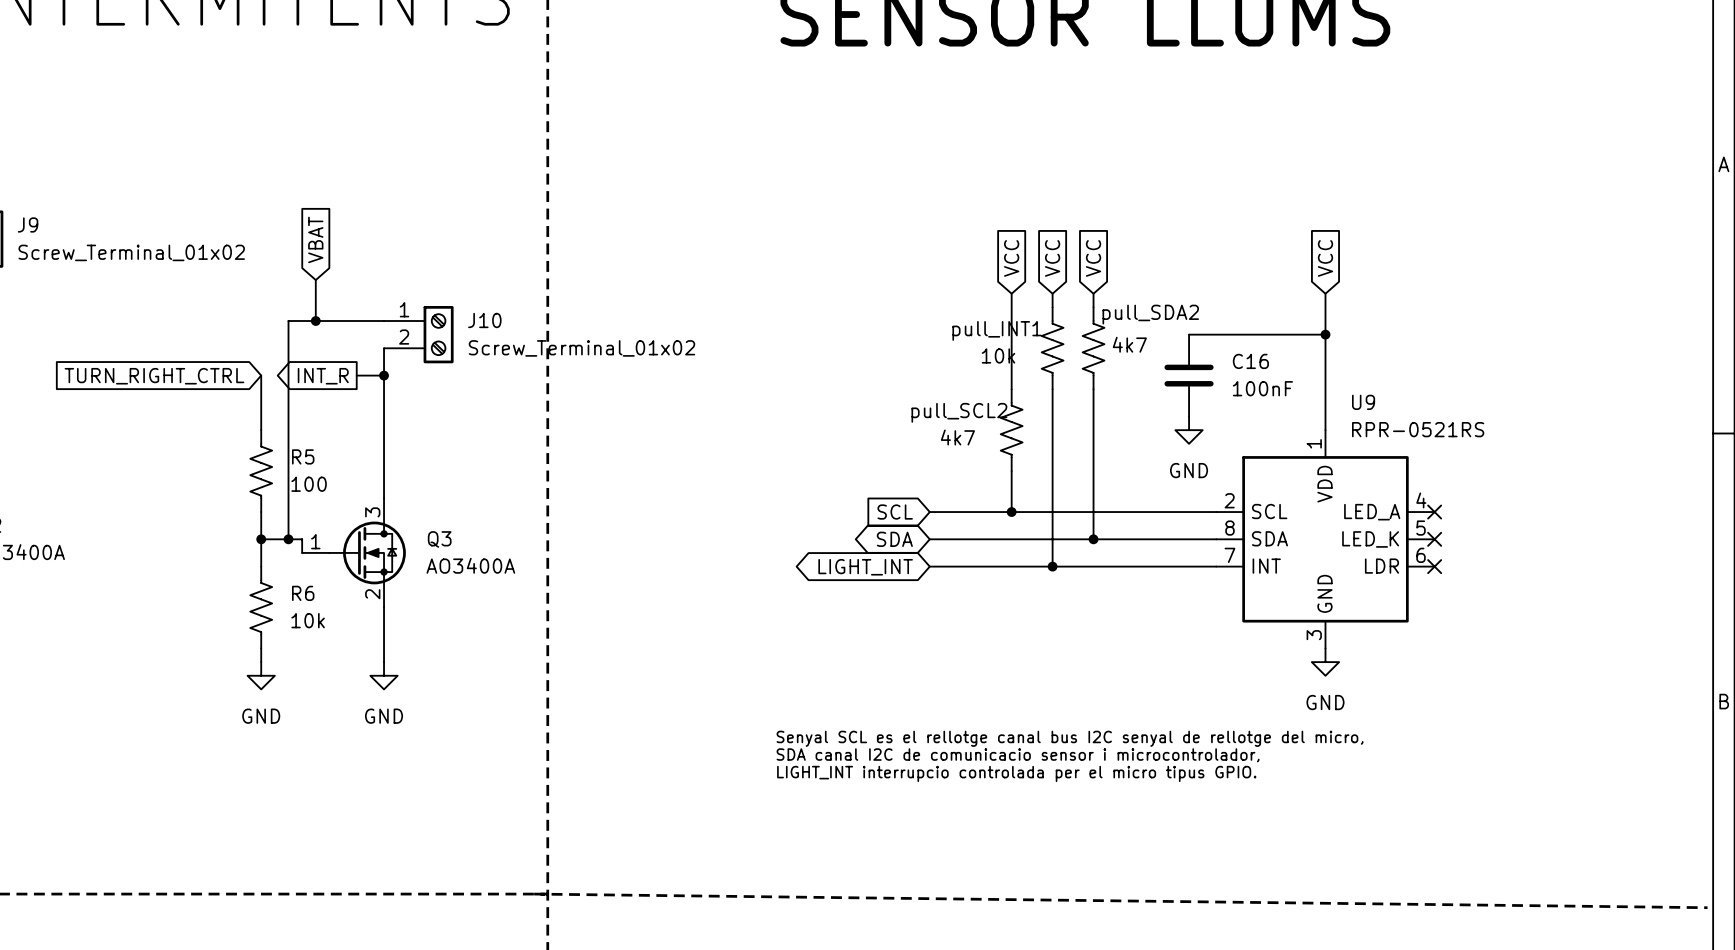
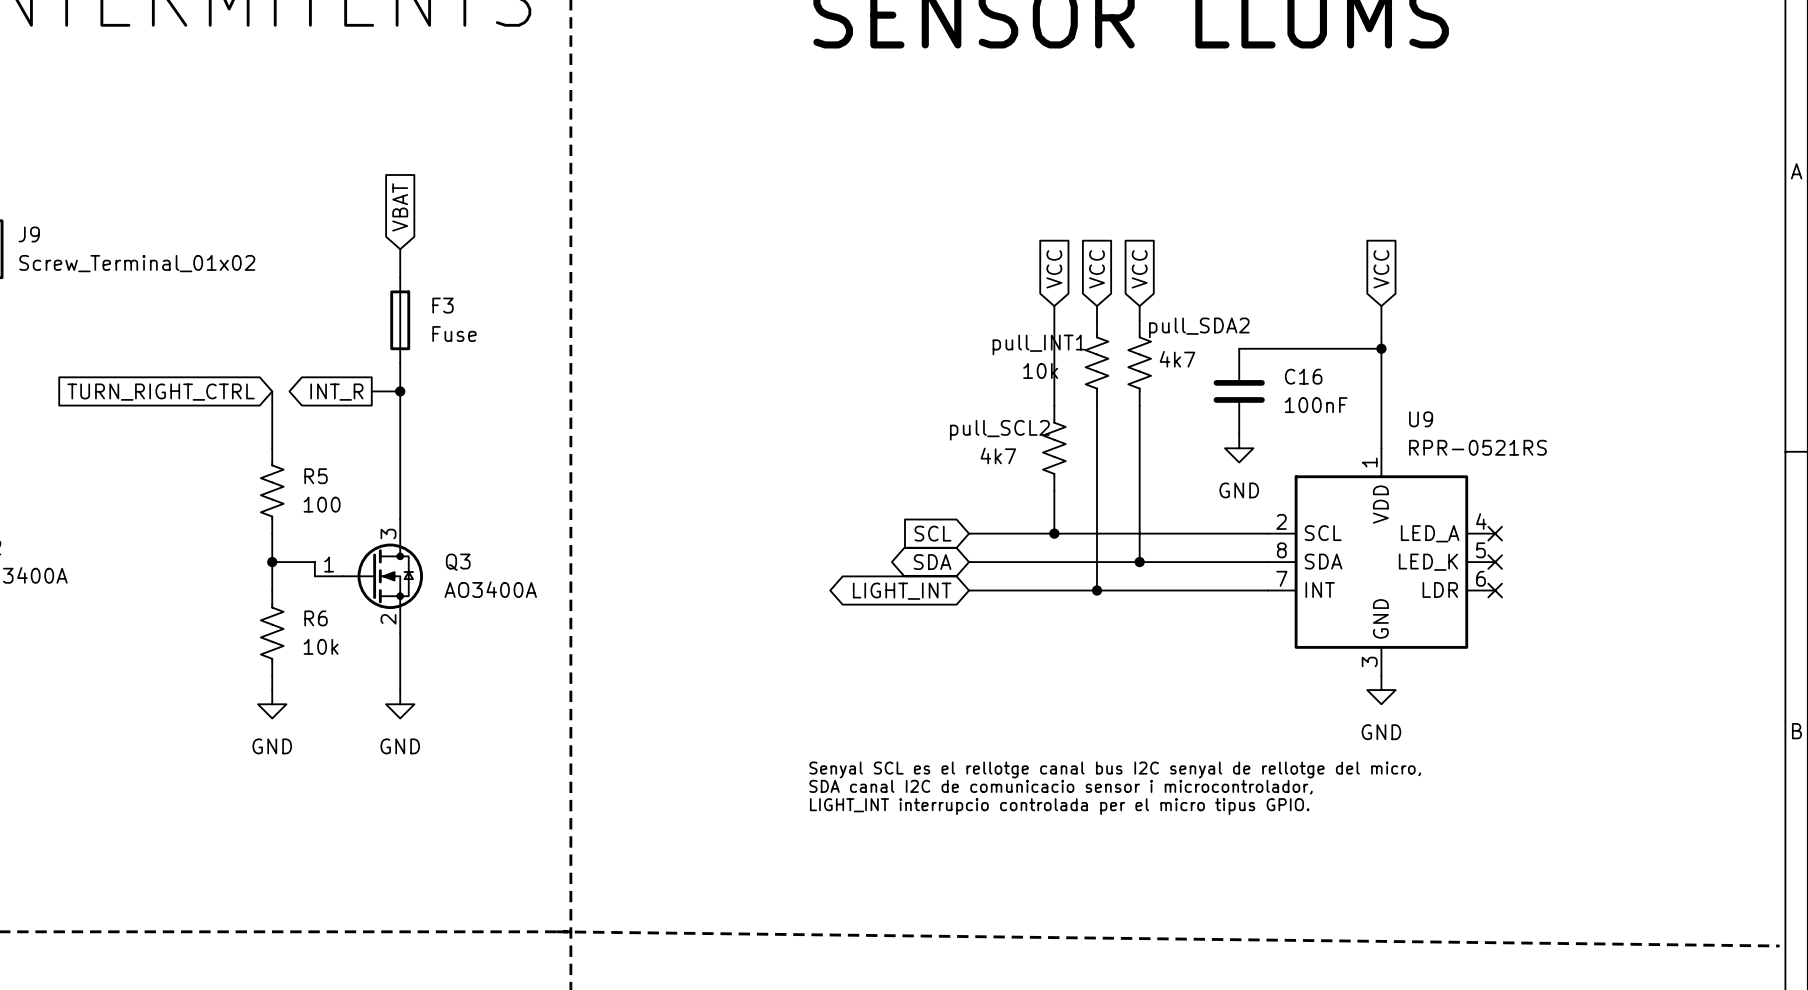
global label position: VBAT (315, 239) -> VBAT (400, 207)
wire: none -> (400, 249) (400, 277)
wire: (315, 280) (315, 321) -> none
F3: none -> Fuse (400, 320)
junction: (315, 321) -> none
wire: (384, 321) (288, 321) (288, 539) -> none
J10: Screw_Terminal_01x02 (418, 334) -> none
junction: (288, 539) -> none

